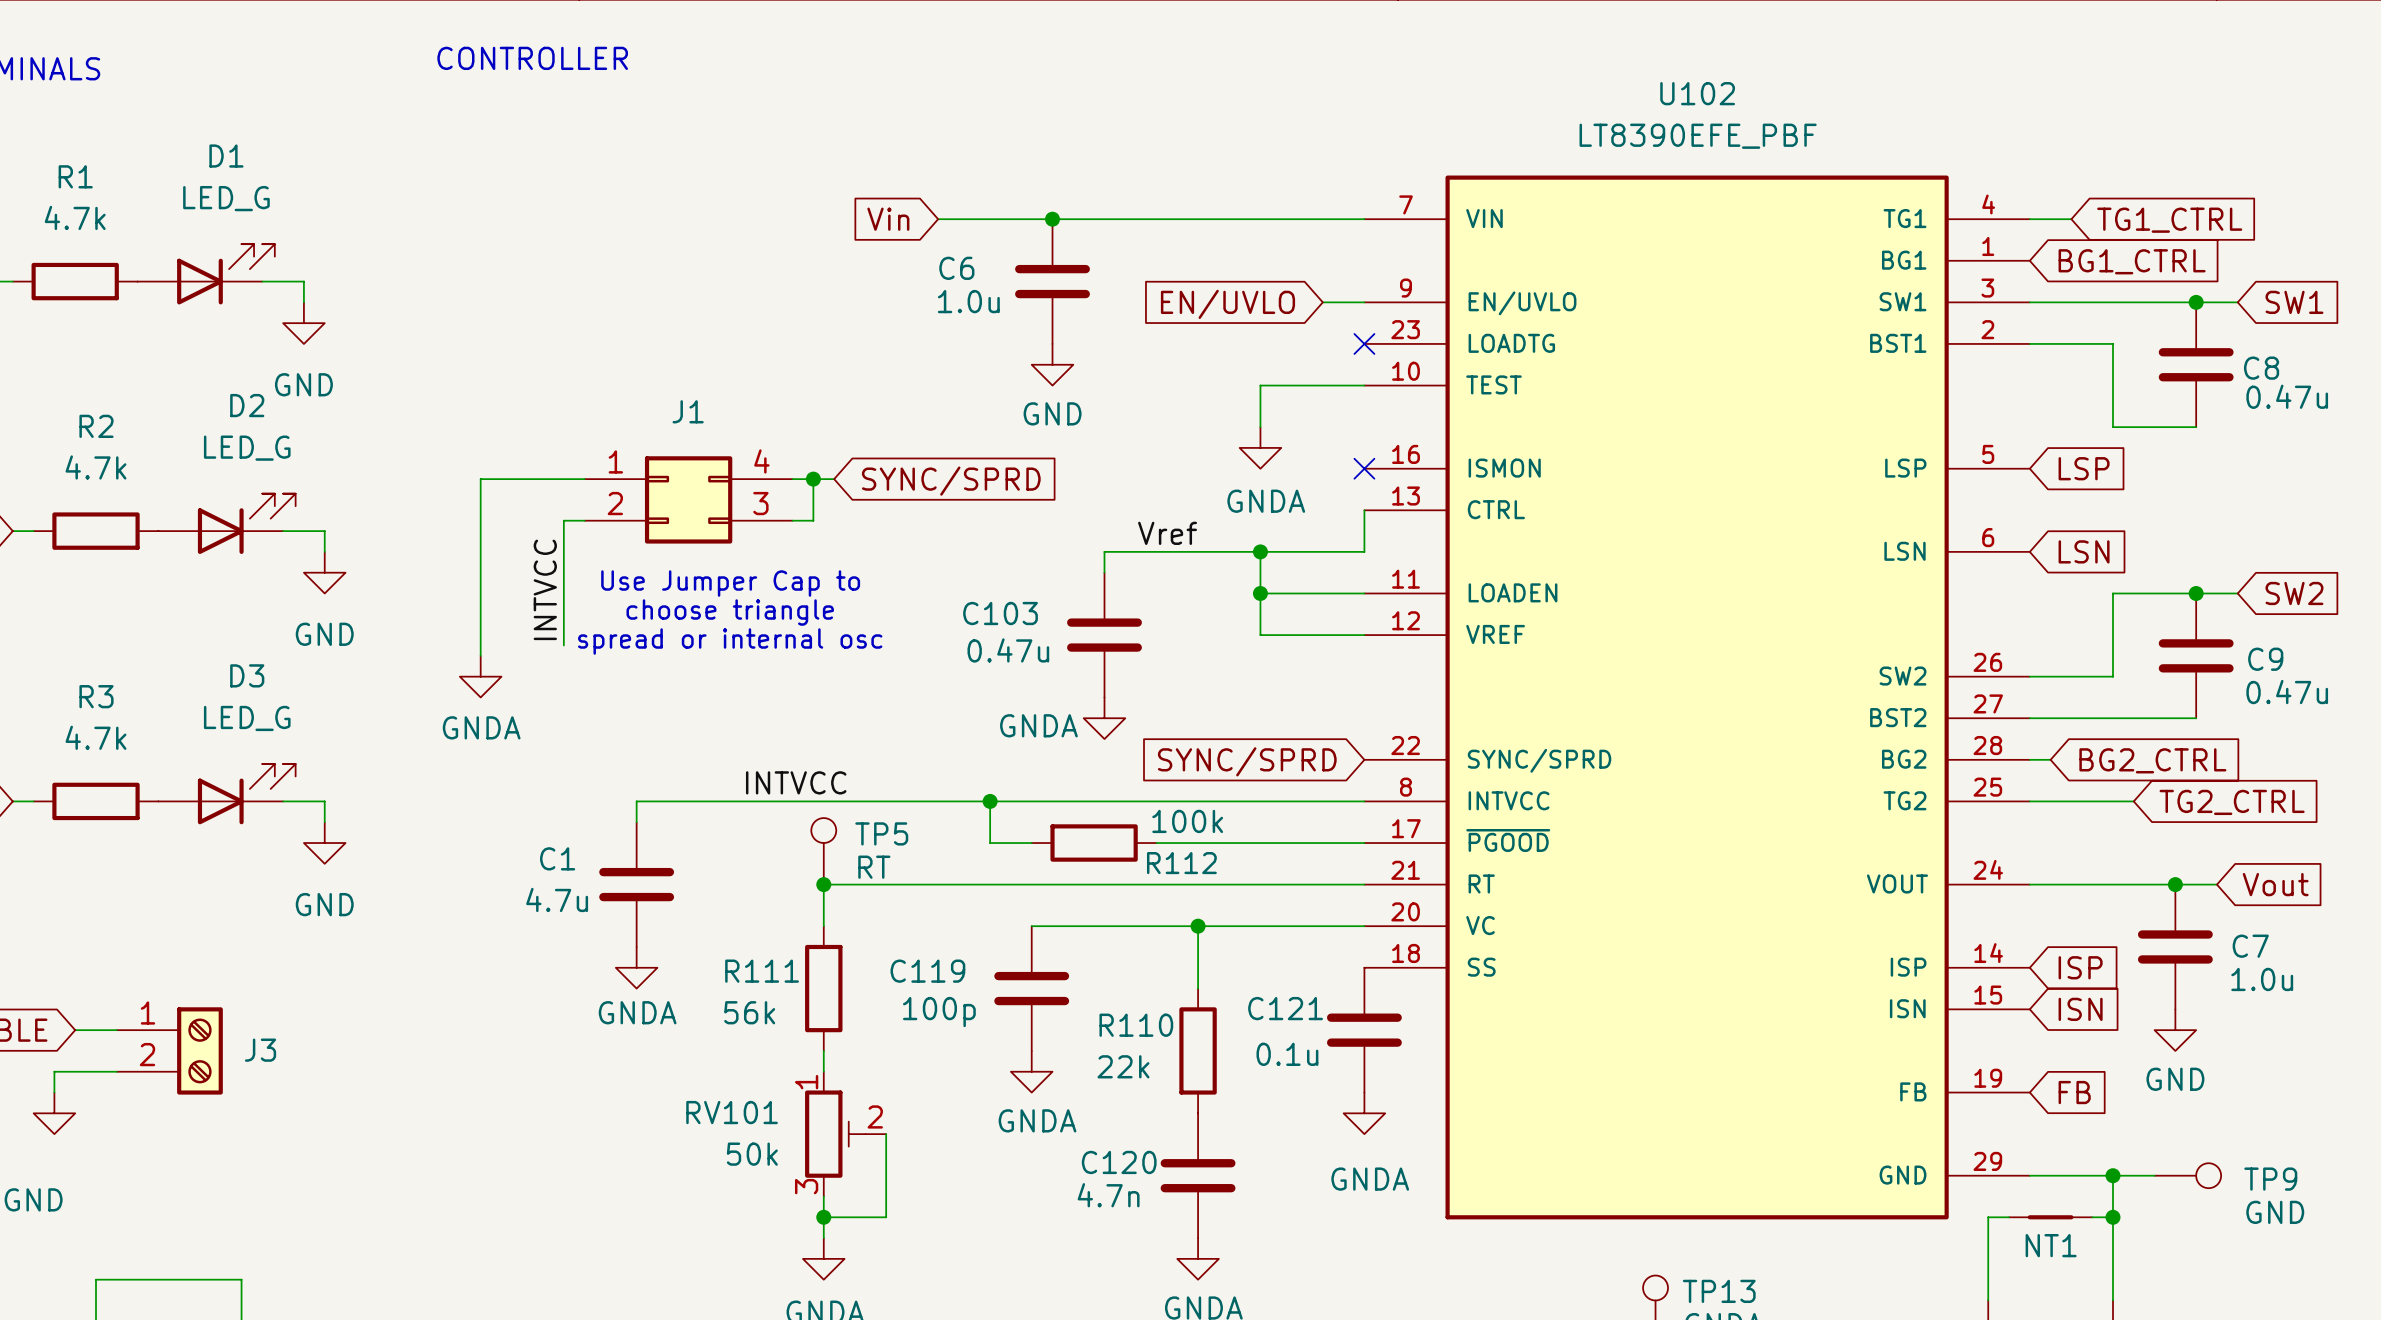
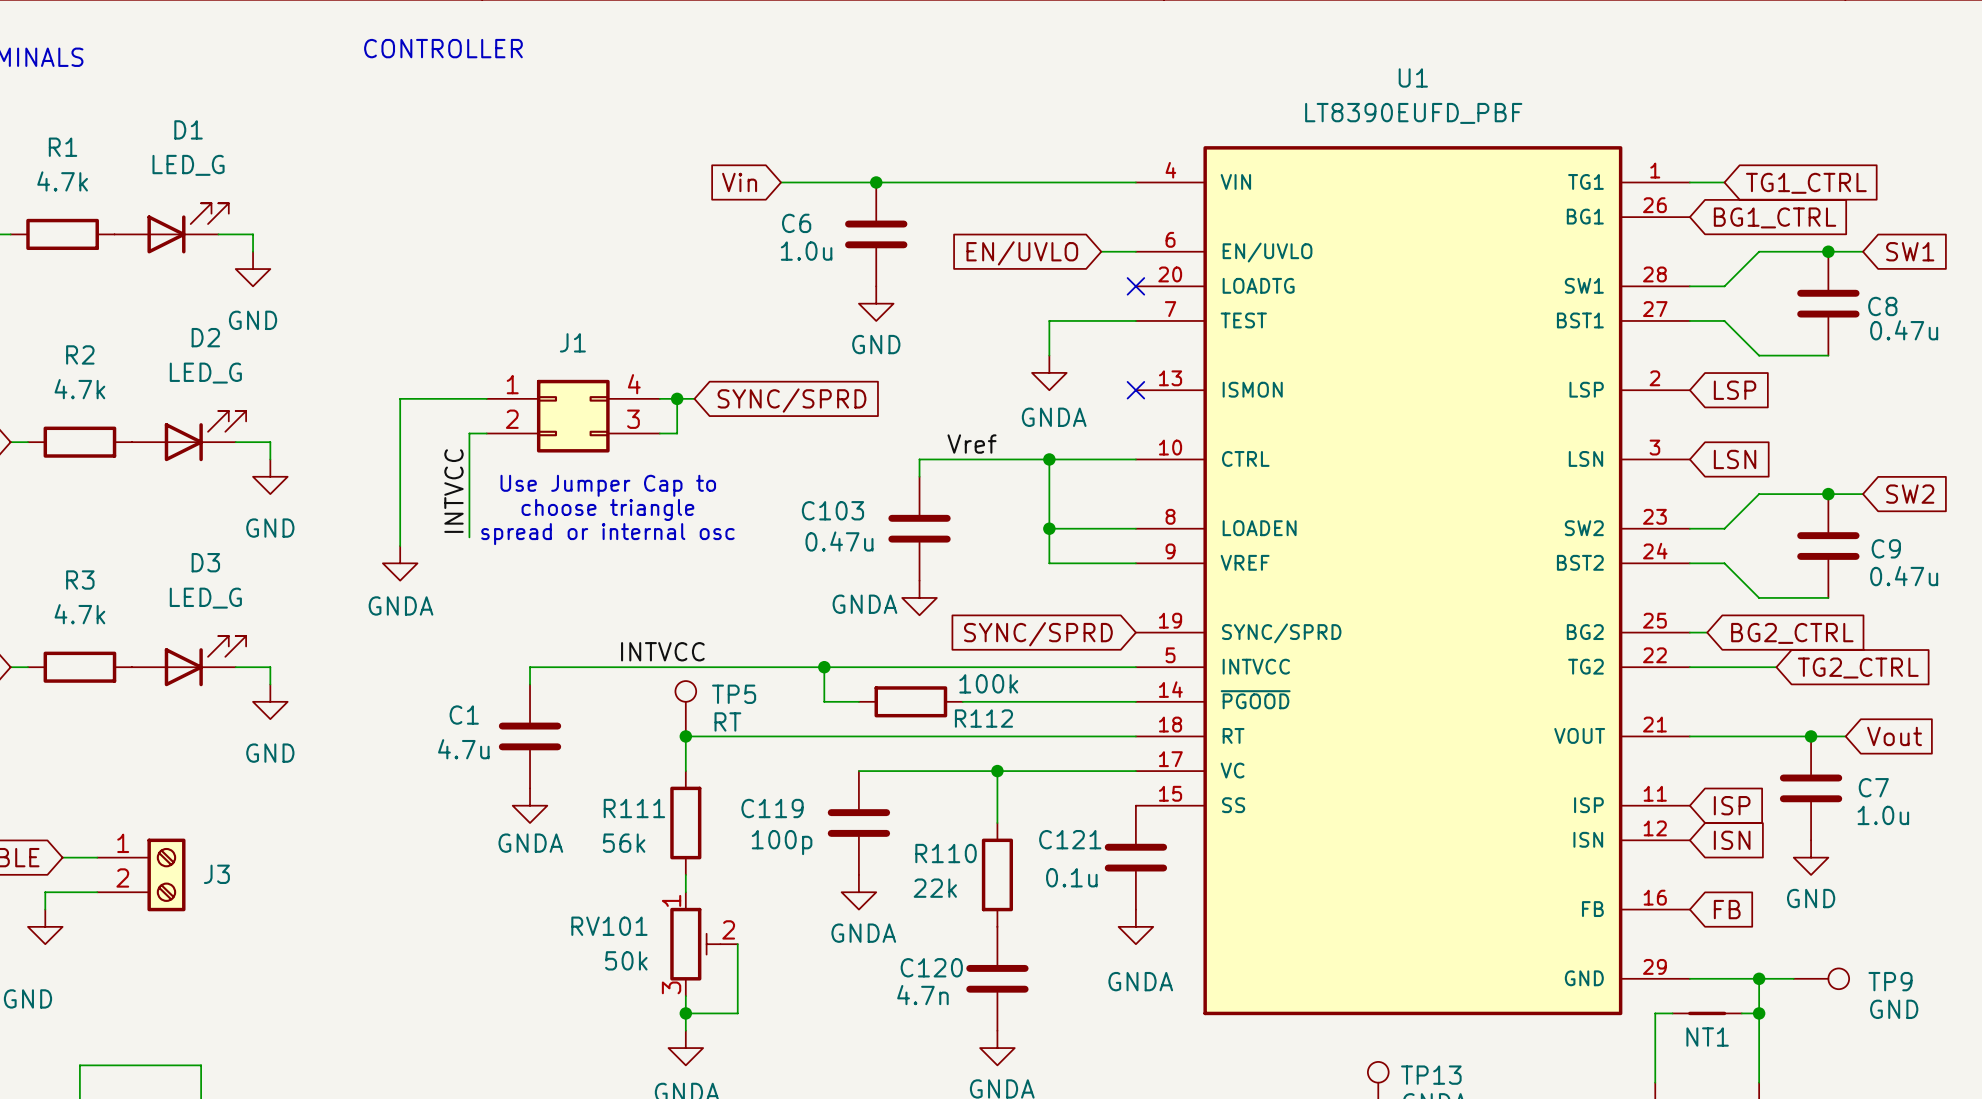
wire: (2029, 302) (2112, 302) -> (1724, 286) (1759, 251)
wire: (2071, 343) (2112, 343) (2112, 427) -> (1689, 320) (1724, 320) (1759, 355)
wire: (1364, 510) (1364, 551) -> none
wire: (1260, 593) (1364, 593) -> none
junction position: (1260, 593) -> (1049, 528)
wire: (2112, 593) (2112, 676) (2071, 676) -> (1759, 494) (1724, 528) (1689, 528)
wire: none -> (1049, 528) (1049, 563) (1135, 563)
U102: LT8390EFE_PBF (1697, 697) -> none
U1: none -> LT8390EUFD_PBF (1412, 580)
wire: (2029, 718) (2112, 718) -> (1724, 563) (1759, 597)

